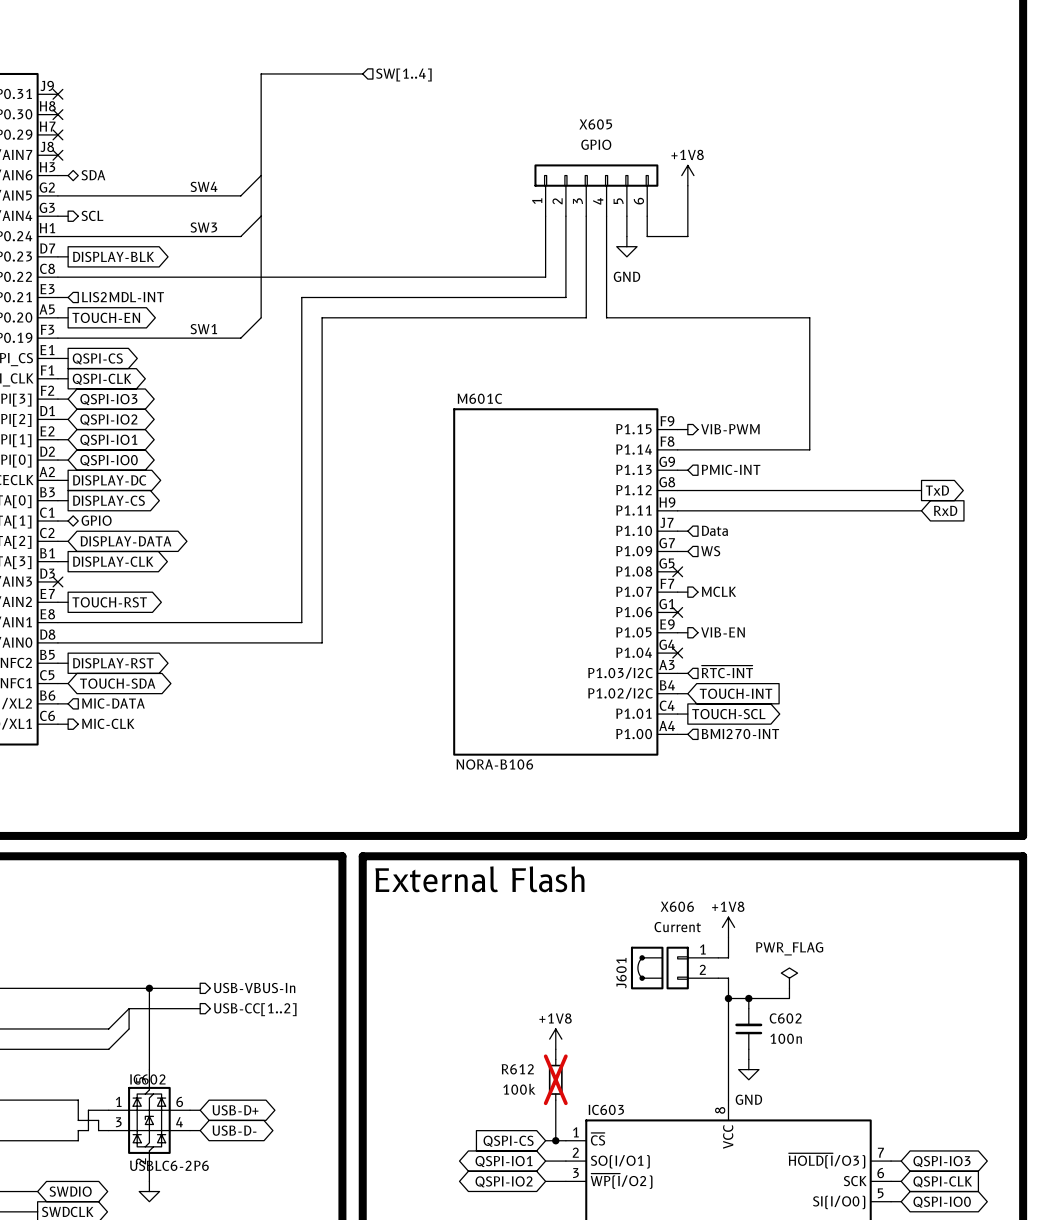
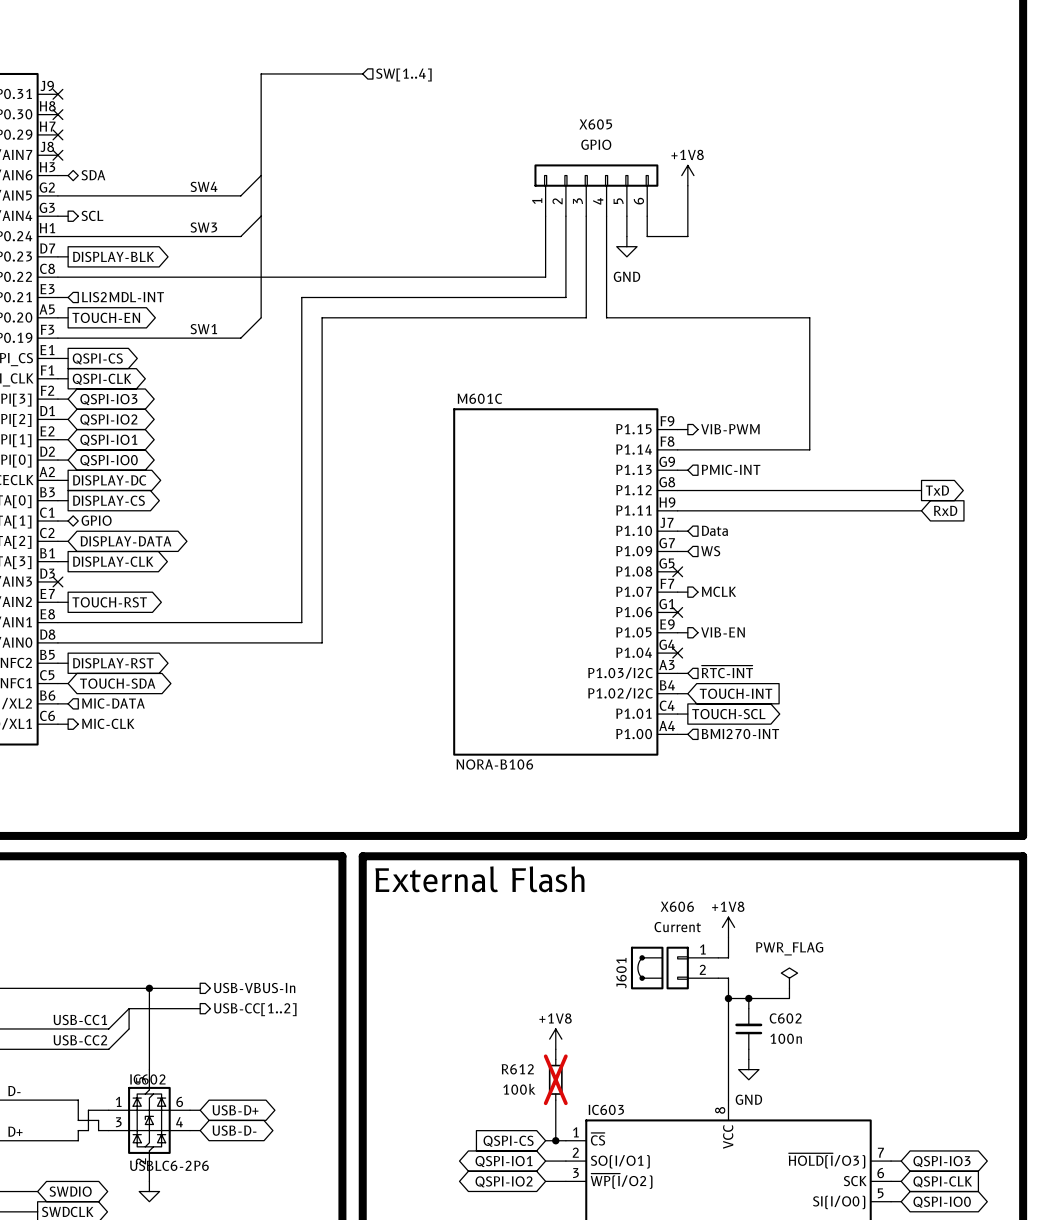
label: none -> USB-CC1 (80, 1019)
label: none -> USB-CC2 (80, 1040)
label: none -> D- (14, 1091)
label: none -> D+ (15, 1131)

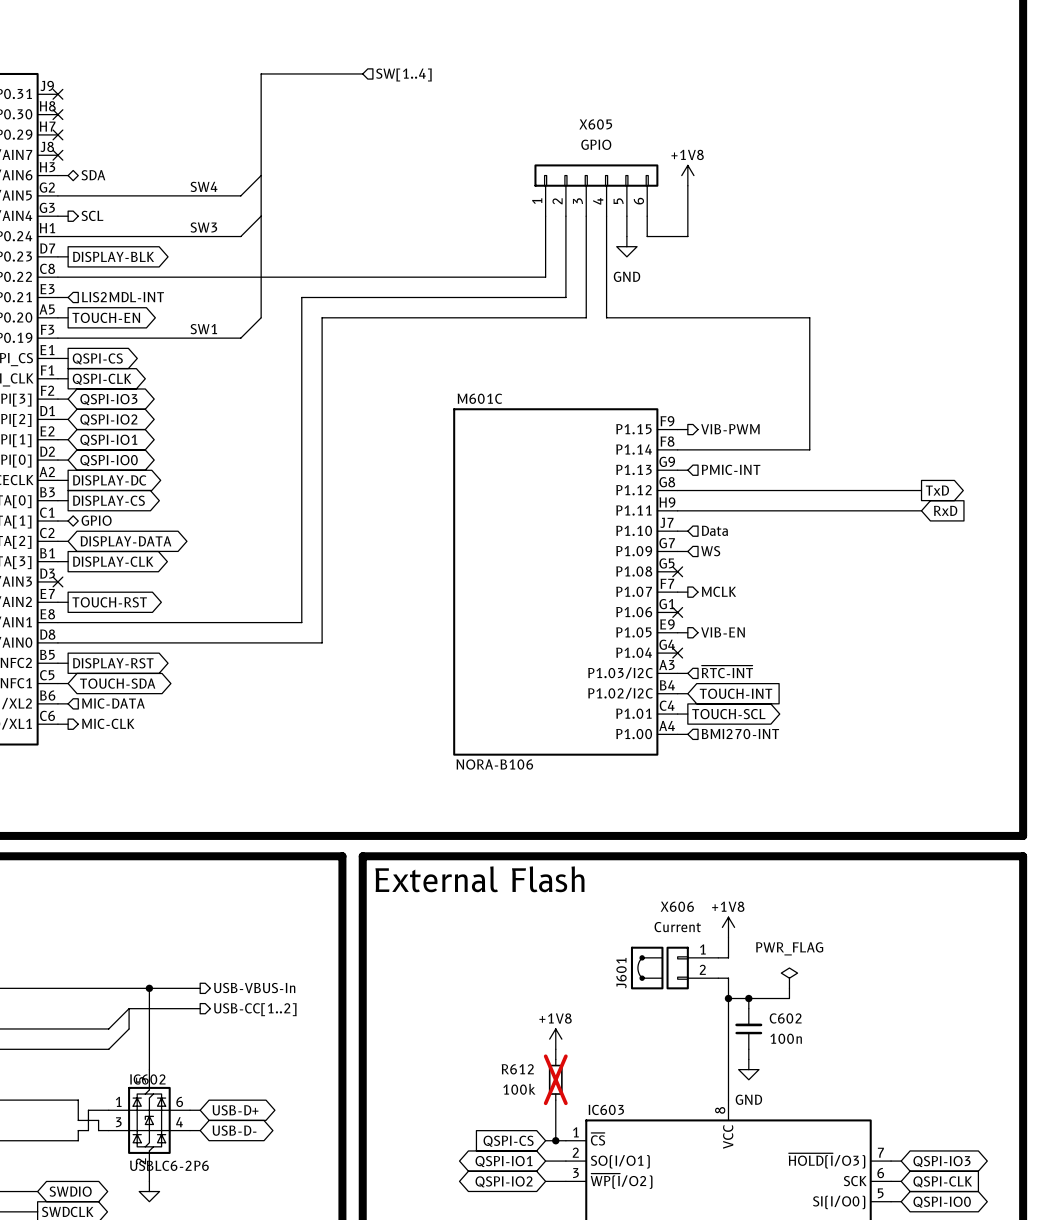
label: USB-CC1 (80, 1019) -> none
label: USB-CC2 (80, 1040) -> none
label: D- (14, 1091) -> none
label: D+ (15, 1131) -> none

